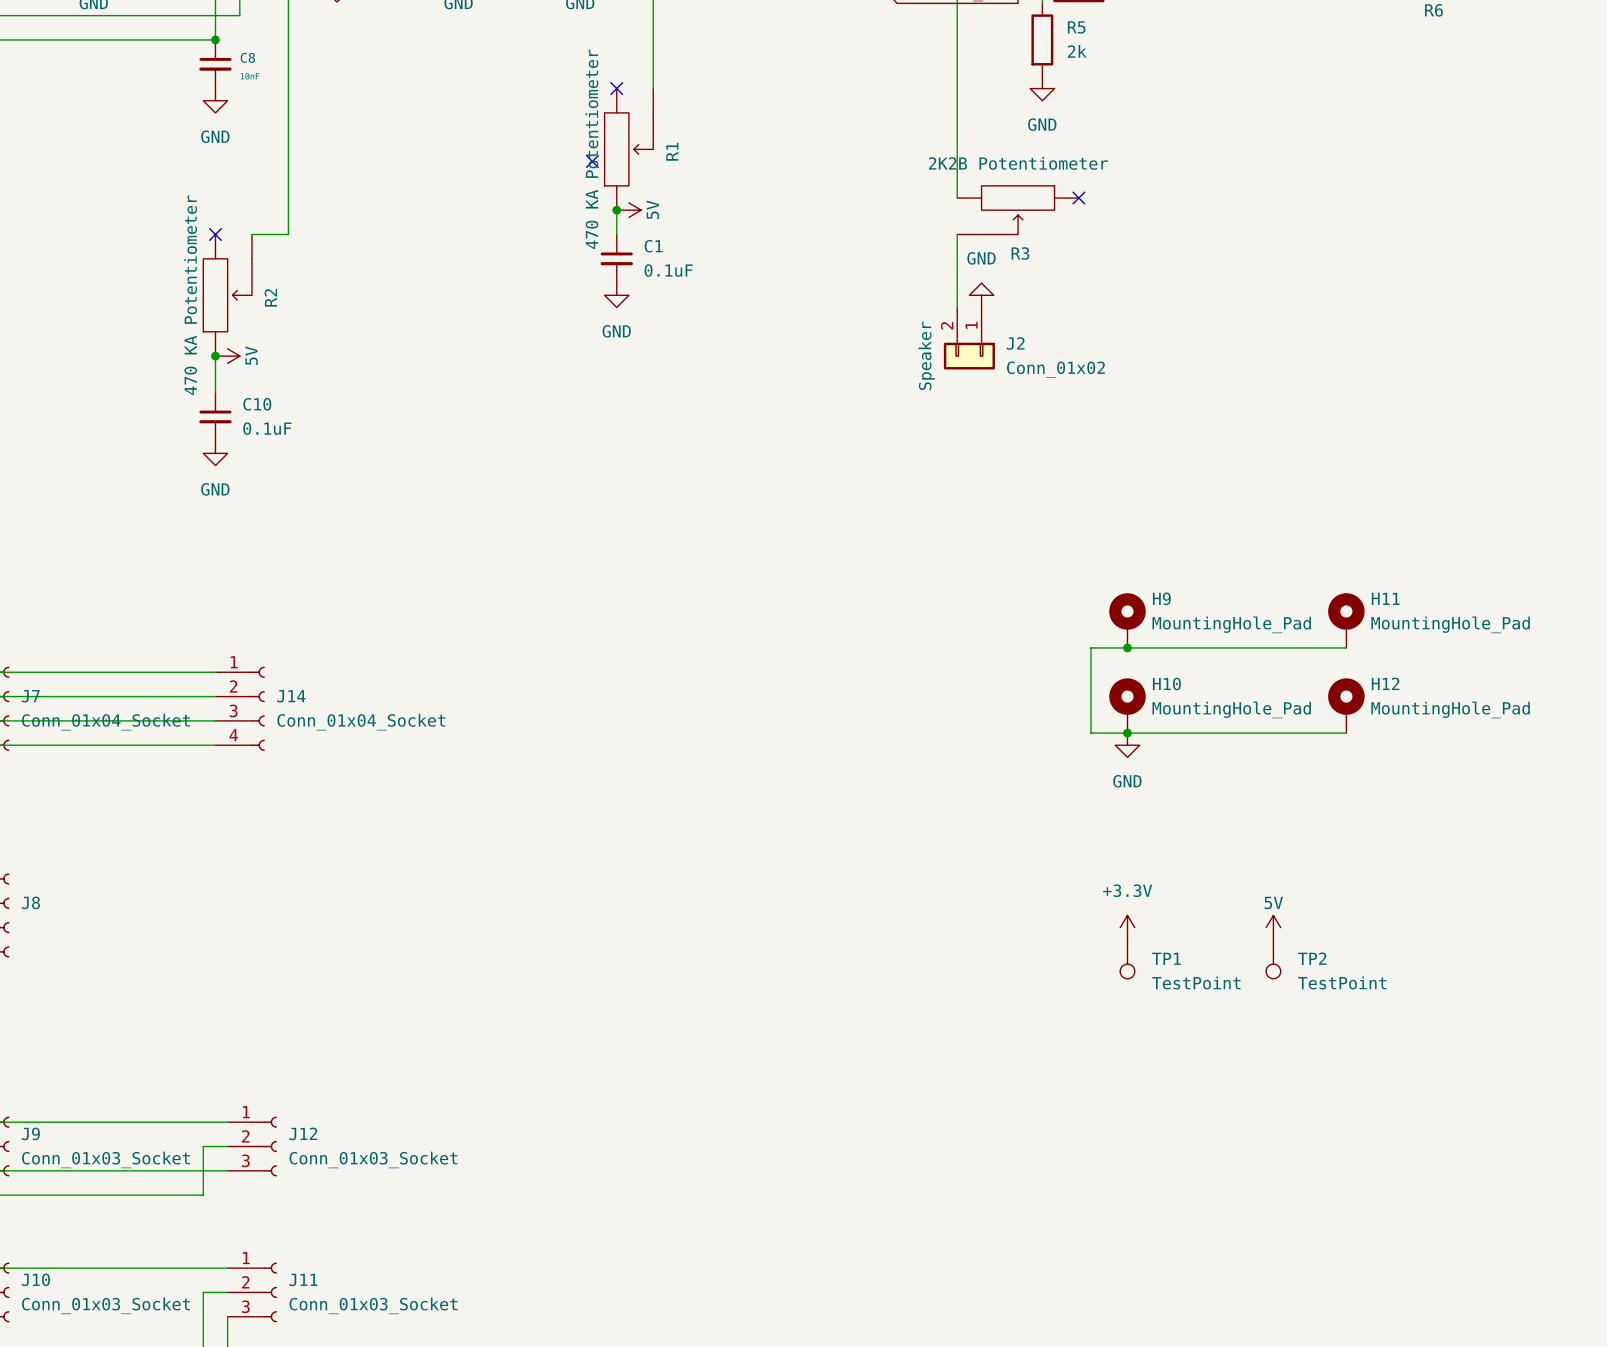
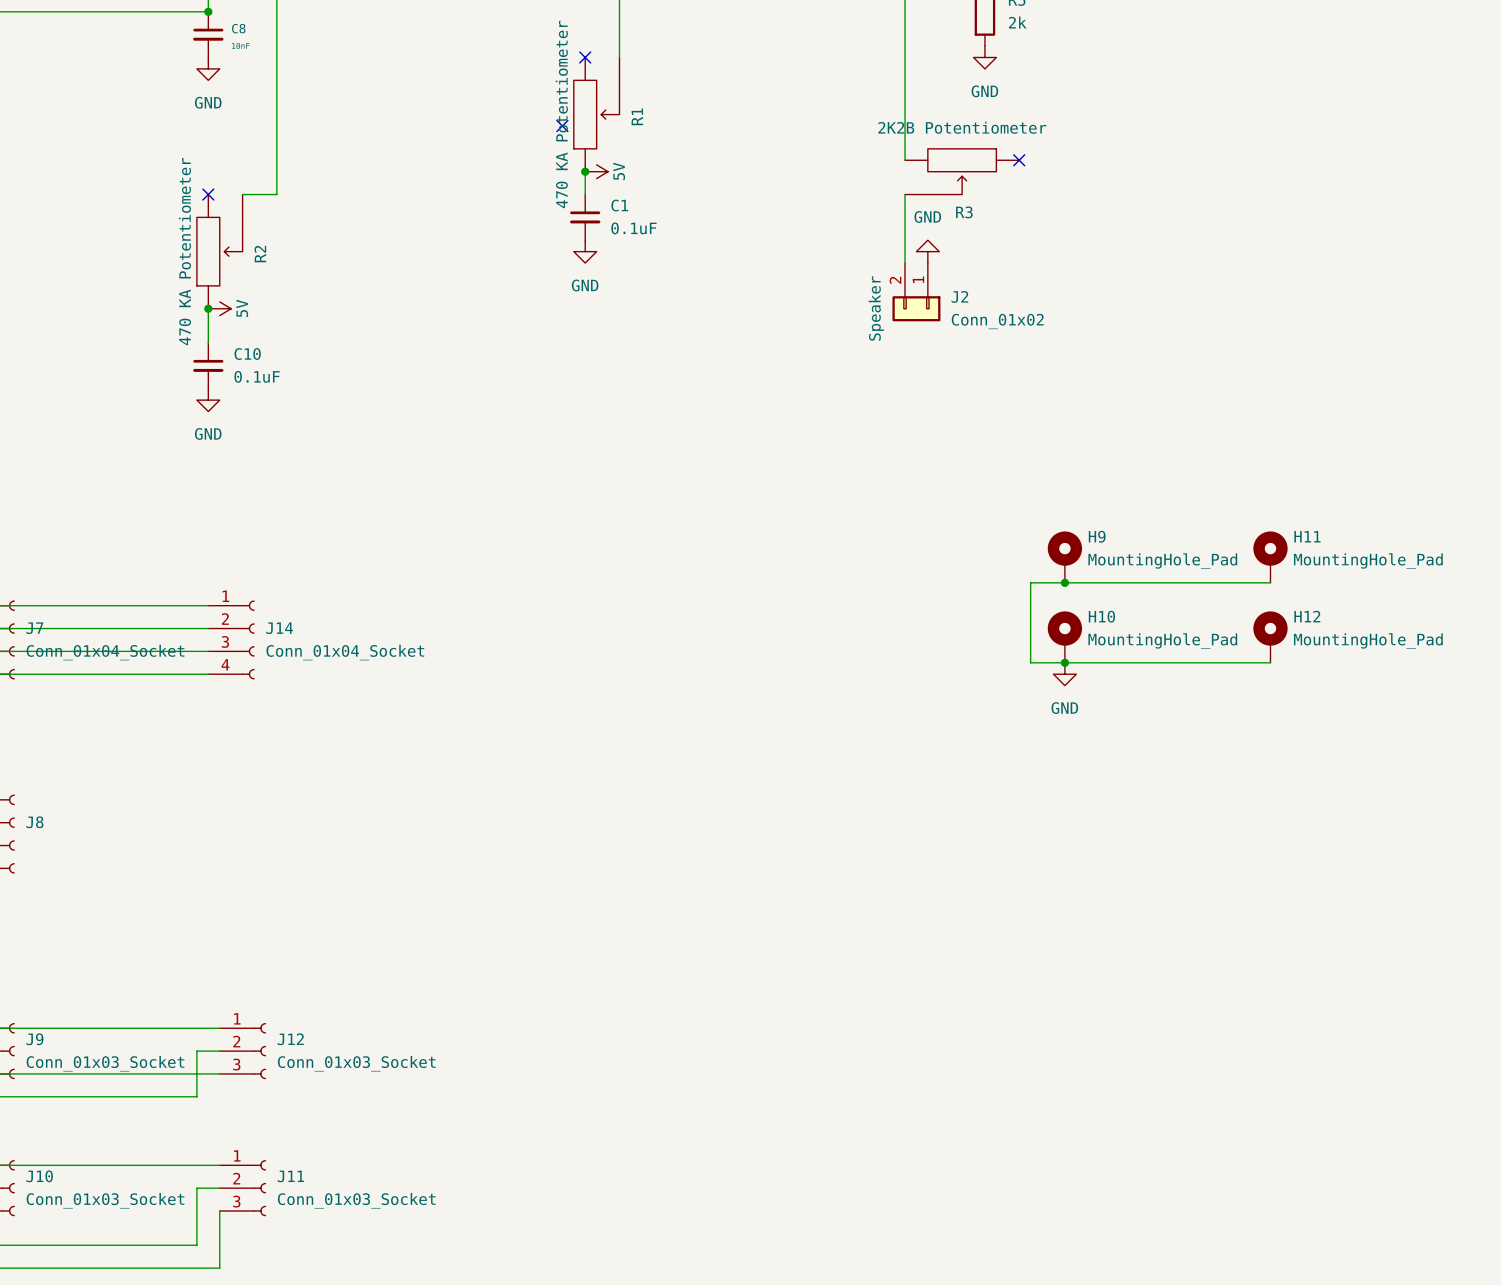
power symbol: +3.3V (1127, 927) -> none
power symbol: 5V (1273, 927) -> none
TP1: TestPoint (1127, 959) -> none
TP2: TestPoint (1273, 959) -> none

